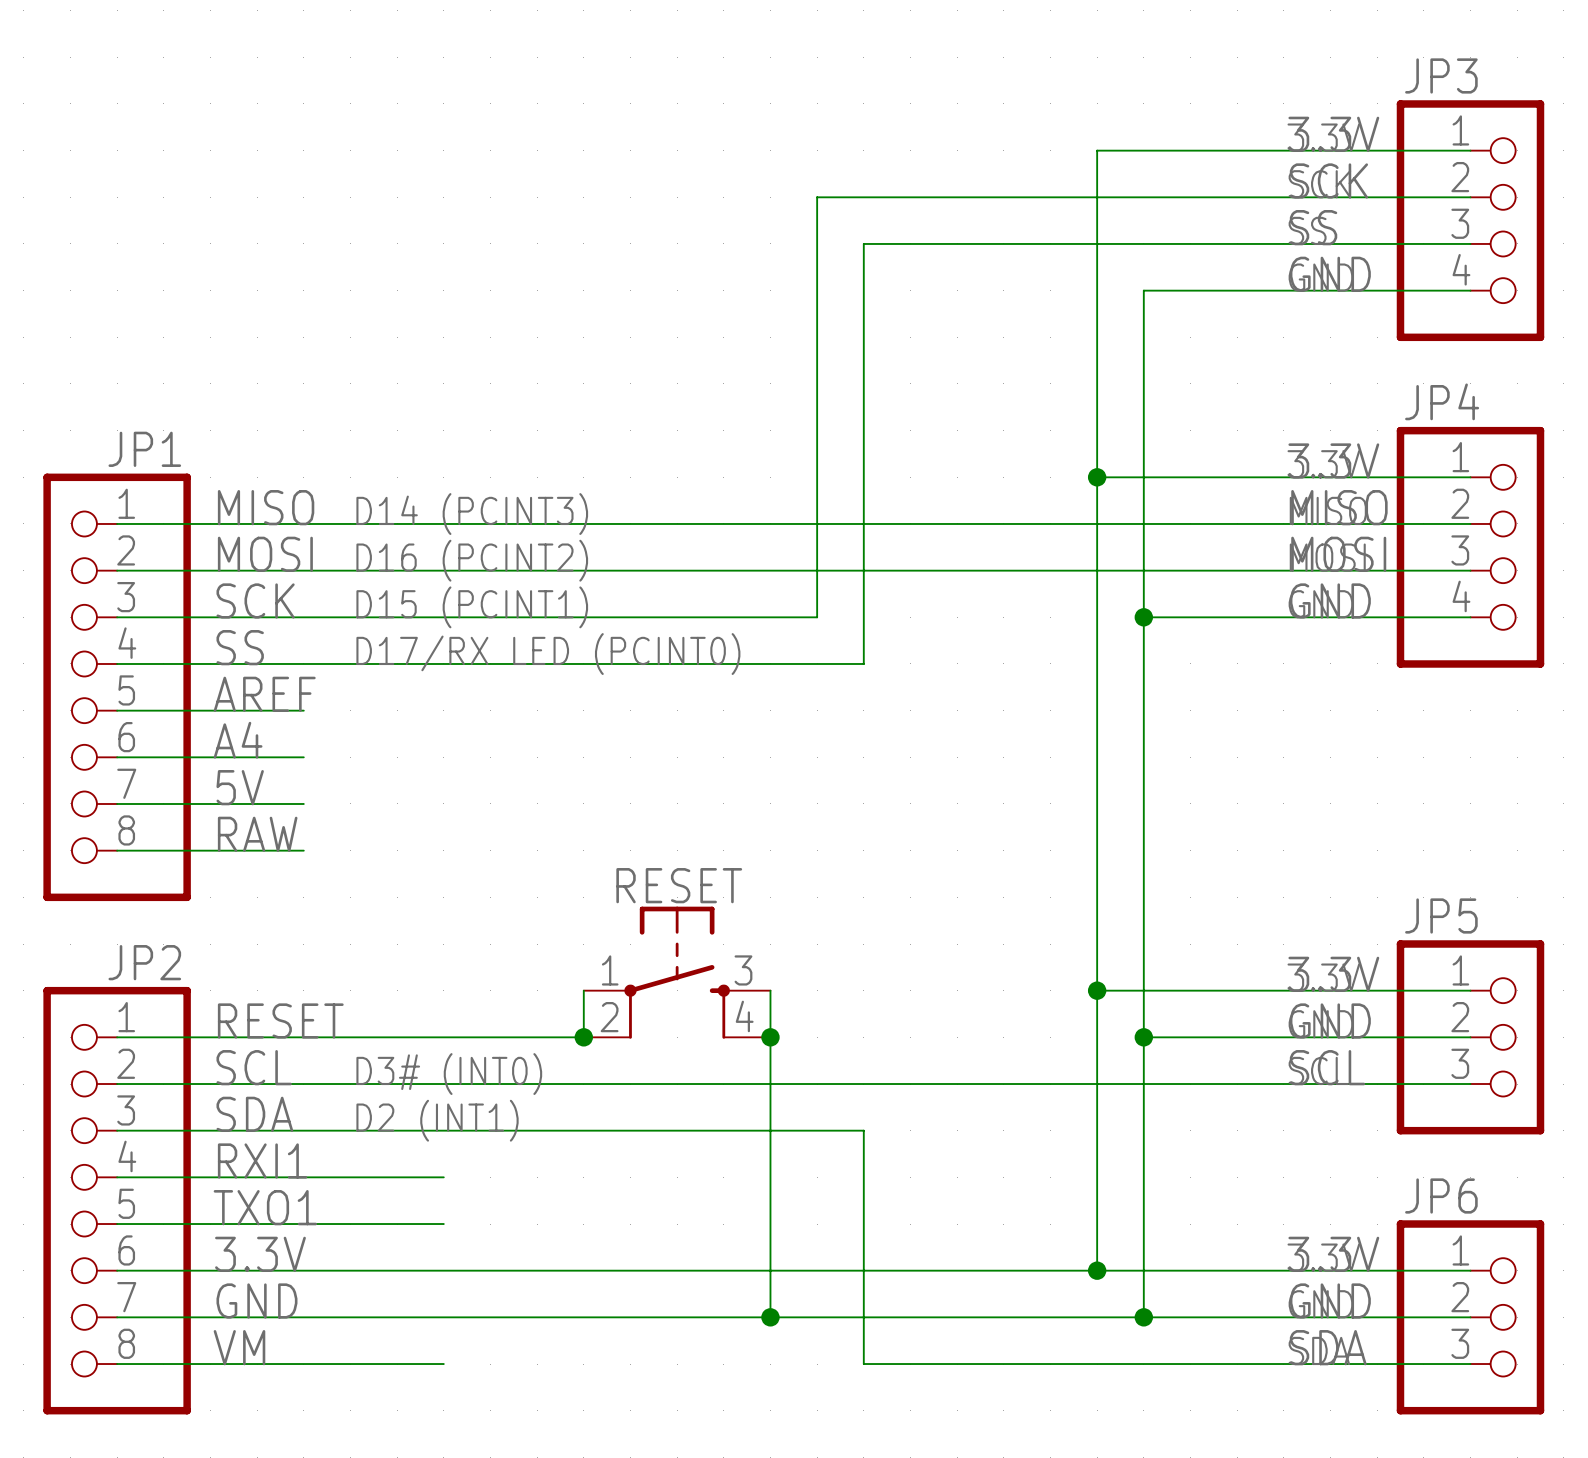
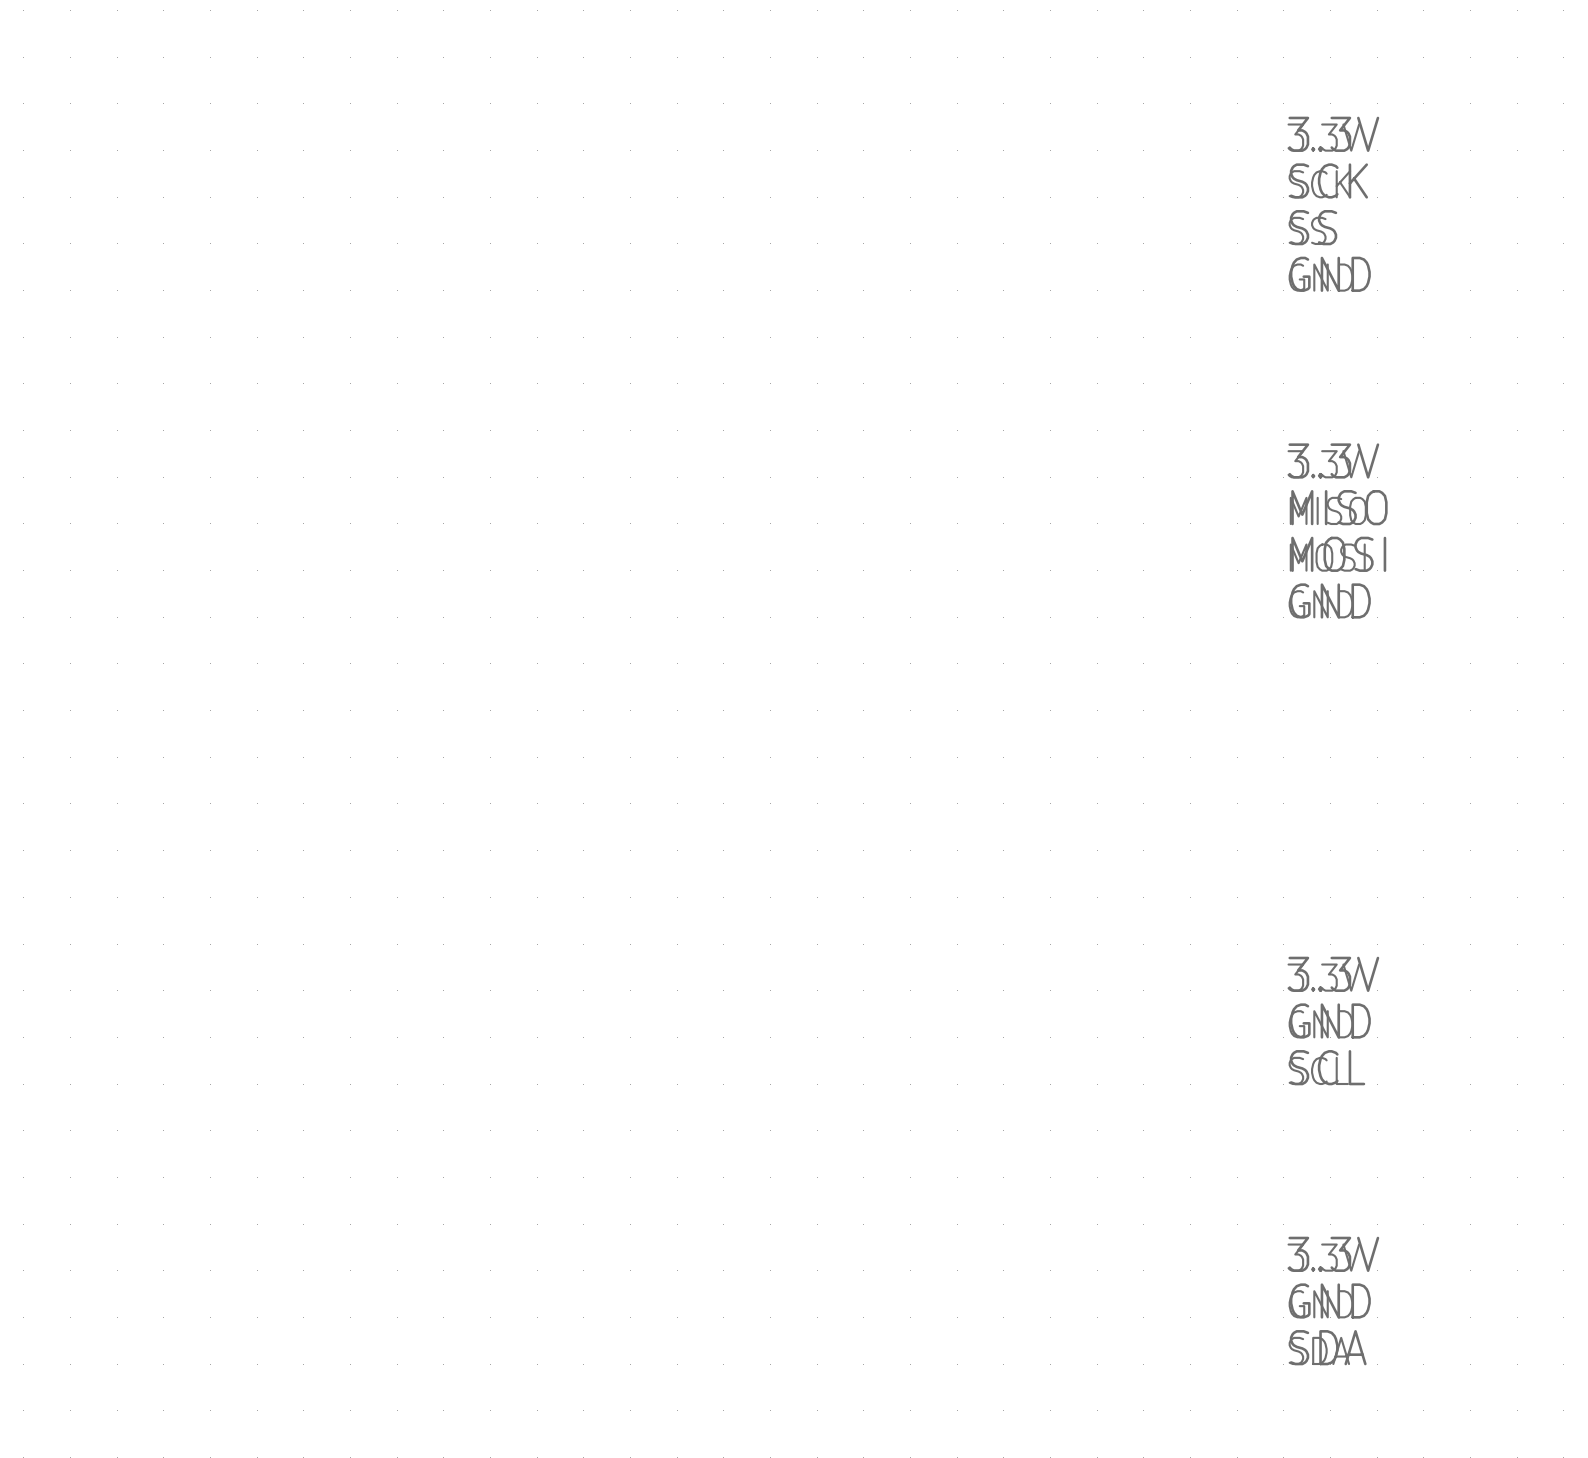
wire: (1470, 150) (1097, 150) (1097, 1270) -> none
wire: (1470, 197) (817, 197) (817, 617) (117, 617) -> none
JP3: (1470, 220) -> none
wire: (1470, 243) (863, 243) (863, 663) (117, 663) -> none
wire: (1470, 290) (1143, 290) (1143, 1317) -> none
wire: (1097, 477) (1470, 477) -> none
junction: (1097, 477) -> none
label: MISO (266, 507) -> none
text: D14 (PCINT3) (472, 514) -> none
wire: (117, 523) (1470, 523) -> none
JP4: (1470, 547) -> none
label: MOSI (265, 554) -> none
text: D16 (PCINT2) (472, 560) -> none
wire: (117, 570) (1470, 570) -> none
label: SCK (255, 600) -> none
text: D15 (PCINT1) (472, 607) -> none
wire: (1143, 617) (1470, 617) -> none
junction: (1143, 617) -> none
label: SS (240, 647) -> none
text: D17/RX LED (PCINT0) (548, 654) -> none
JP1: (117, 687) -> none
label: AREF (264, 694) -> none
wire: (117, 710) (303, 710) -> none
label: A4 (238, 740) -> none
wire: (117, 757) (303, 757) -> none
label: 5V (240, 787) -> none
wire: (117, 803) (303, 803) -> none
label: RAW (257, 834) -> none
wire: (117, 850) (303, 850) -> none
RESET: (677, 972) -> none
wire: (583, 990) (583, 1037) (117, 1037) -> none
wire: (770, 990) (770, 1317) -> none
wire: (1097, 990) (1470, 990) -> none
junction: (1097, 990) -> none
label: RESET (280, 1021) -> none
junction: (583, 1037) -> none
junction: (770, 1037) -> none
wire: (1143, 1037) (1470, 1037) -> none
junction: (1143, 1037) -> none
JP5: (1470, 1037) -> none
label: SCL (254, 1067) -> none
text: D3# (INT0) (449, 1074) -> none
wire: (117, 1084) (1470, 1084) -> none
label: SDA (254, 1114) -> none
text: D2 (INT1) (437, 1120) -> none
wire: (117, 1130) (863, 1130) (863, 1364) (1470, 1364) -> none
label: RXI1 (262, 1161) -> none
wire: (117, 1177) (443, 1177) -> none
JP2: (117, 1200) -> none
label: TXO1 (265, 1207) -> none
wire: (117, 1224) (443, 1224) -> none
label: 3.3V (260, 1254) -> none
wire: (117, 1270) (1470, 1270) -> none
junction: (1097, 1270) -> none
label: GND (256, 1301) -> none
wire: (117, 1317) (1470, 1317) -> none
junction: (770, 1317) -> none
junction: (1143, 1317) -> none
JP6: (1470, 1317) -> none
label: VM (239, 1347) -> none
wire: (117, 1364) (443, 1364) -> none

